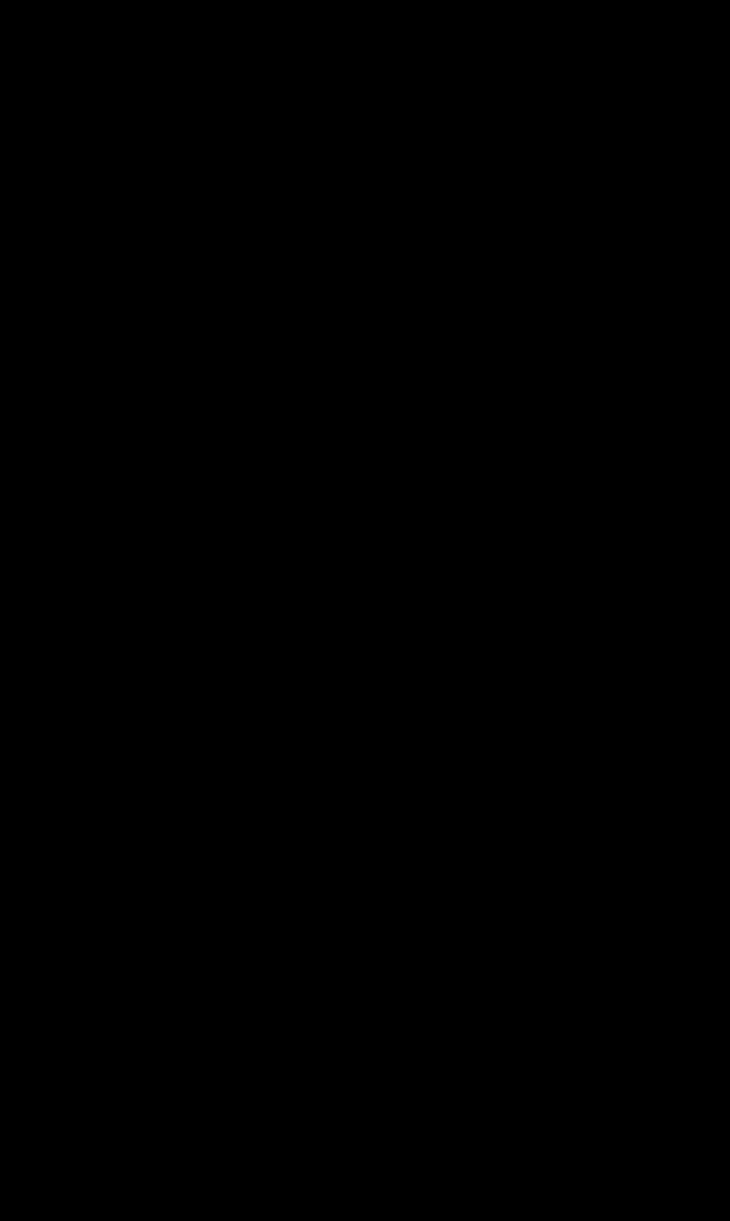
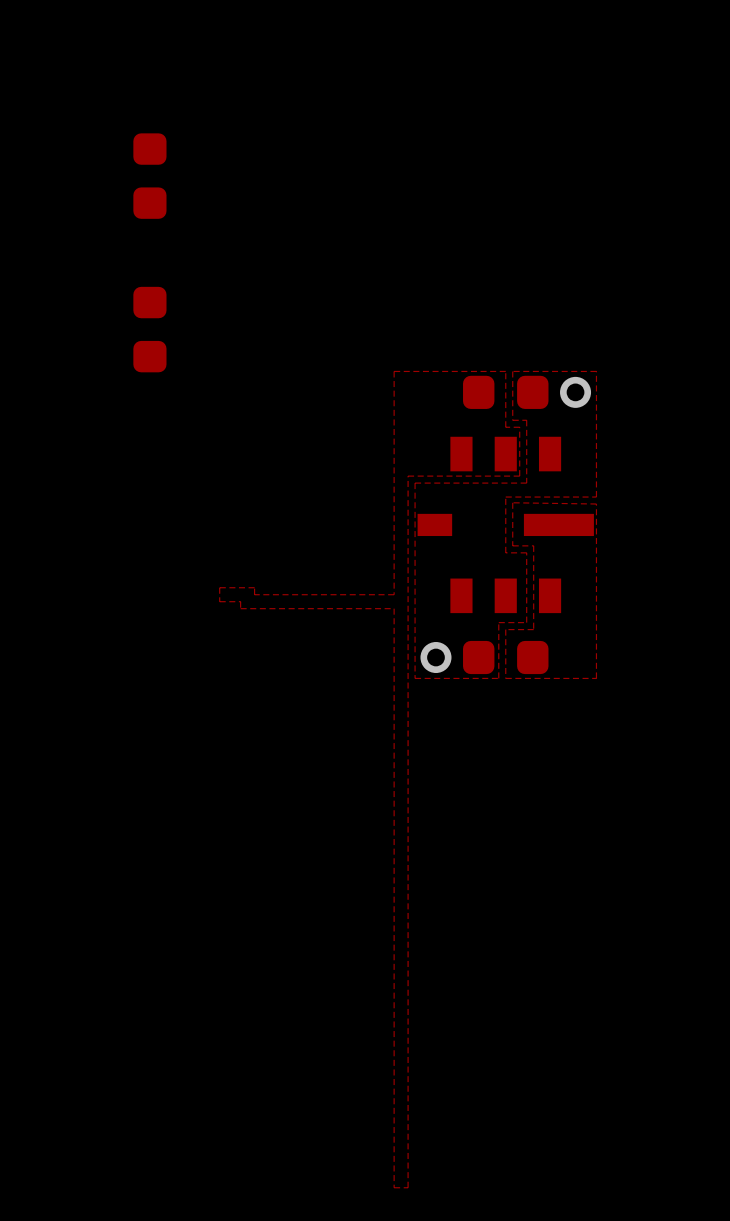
part: none -> (149, 176)
part: none -> (149, 329)
top zone outline: none -> (505, 371) (505, 427) (519, 427) (519, 476) (408, 476) (408, 1187) (394, 1187) (394, 608) (240, 608) (240, 601) (219, 601) (219, 587) (254, 587) (254, 594) (394, 594) (394, 371) (505, 371)
top zone outline: none -> (596, 371) (596, 497) (505, 497) (505, 552) (526, 552) (526, 622) (498, 622) (498, 678) (415, 678) (415, 483) (526, 483) (526, 420) (512, 420) (512, 371) (596, 371)
part: none -> (505, 392)
via: none -> (575, 392)
top zone outline: none -> (512, 502) (512, 545) (533, 545) (533, 629) (505, 629) (505, 678) (596, 678) (596, 504) (512, 502)
part: none -> (505, 524)
via: none -> (435, 657)
part: none -> (505, 657)

